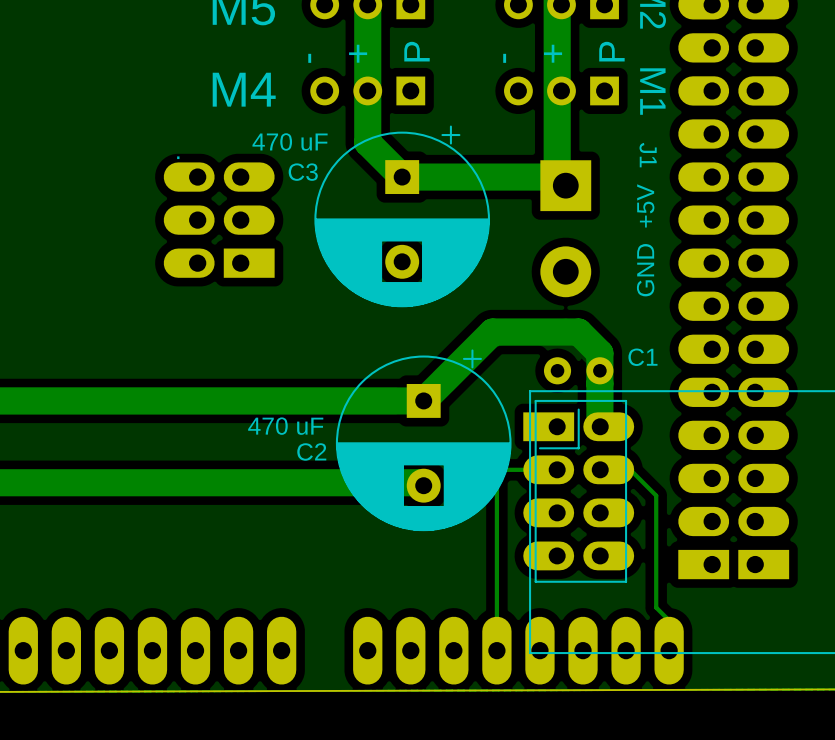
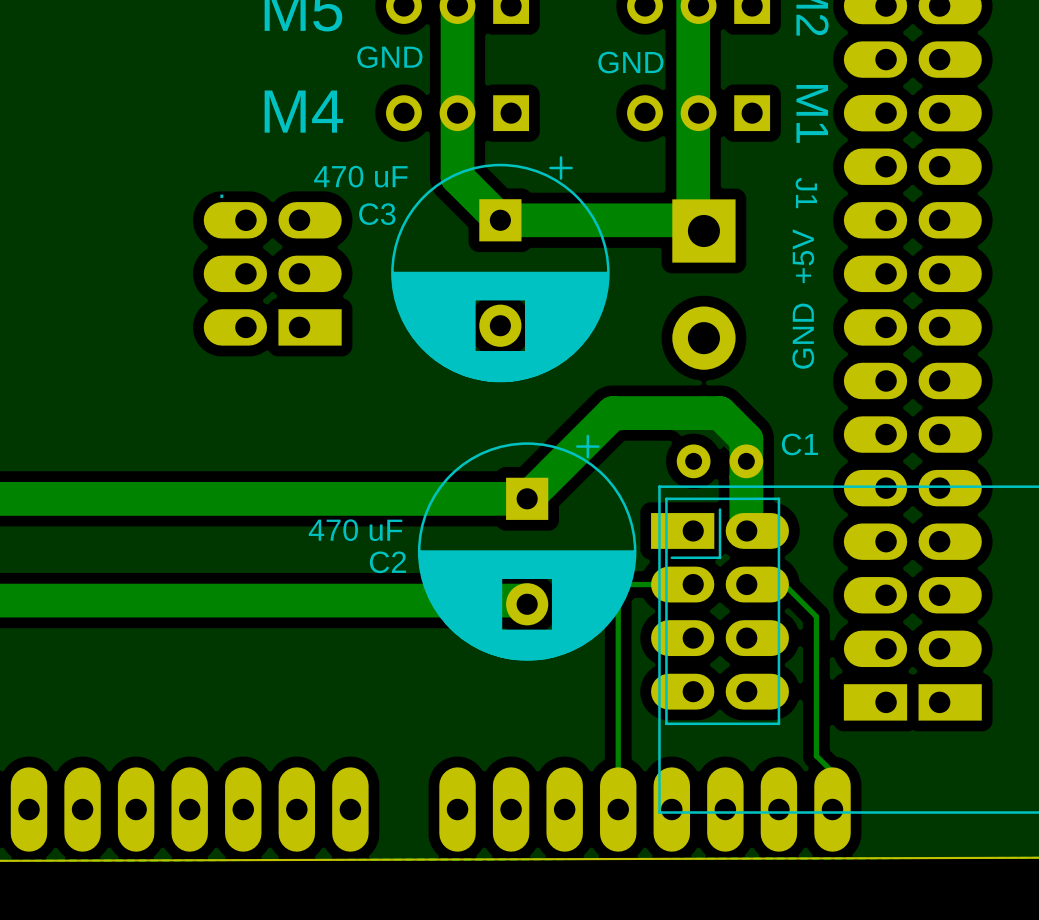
text: none -> GND (389, 57)
text: none -> GND (630, 62)
text: P (417, 51) -> none
text: P (611, 51) -> none
text: + (358, 53) -> none
text: + (553, 53) -> none
text: - (309, 58) -> none
text: - (504, 58) -> none

